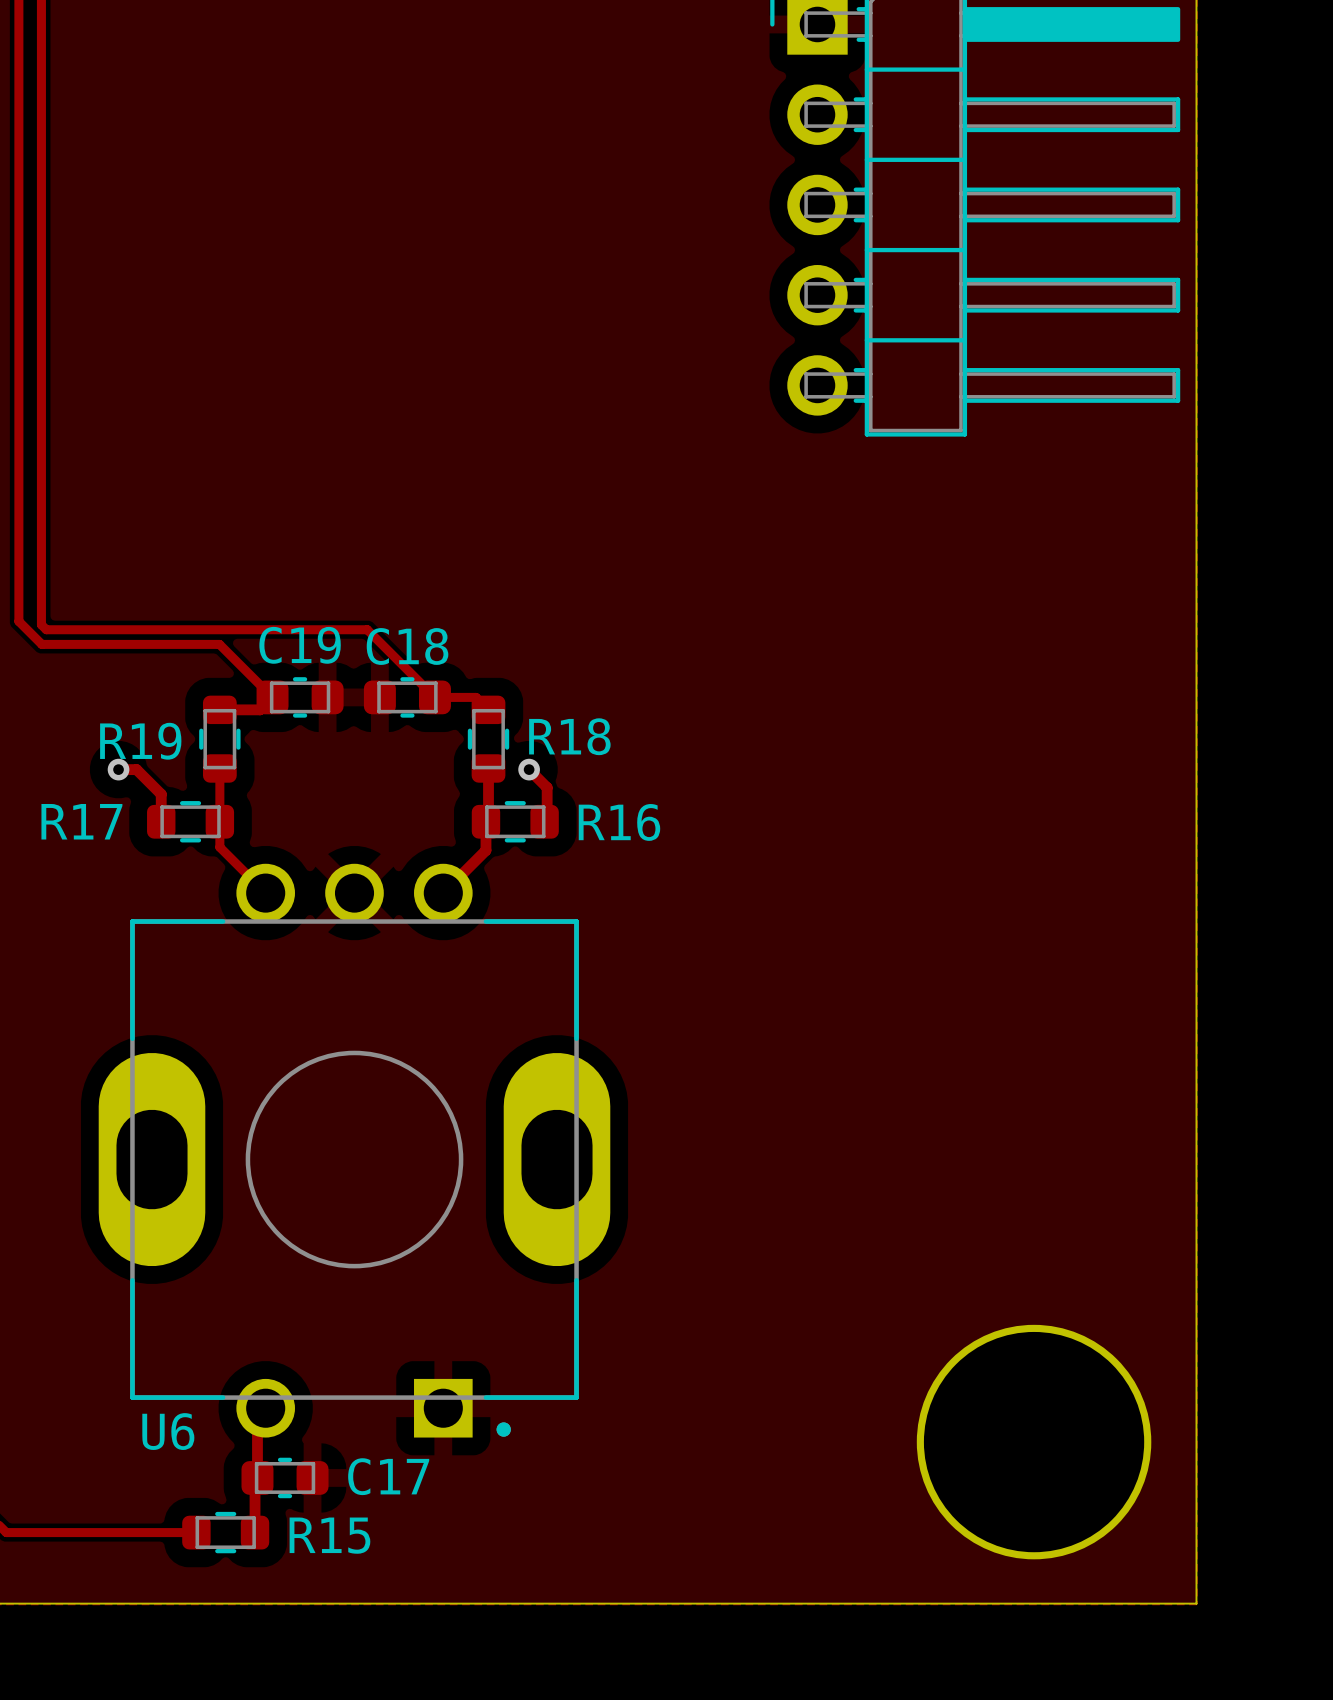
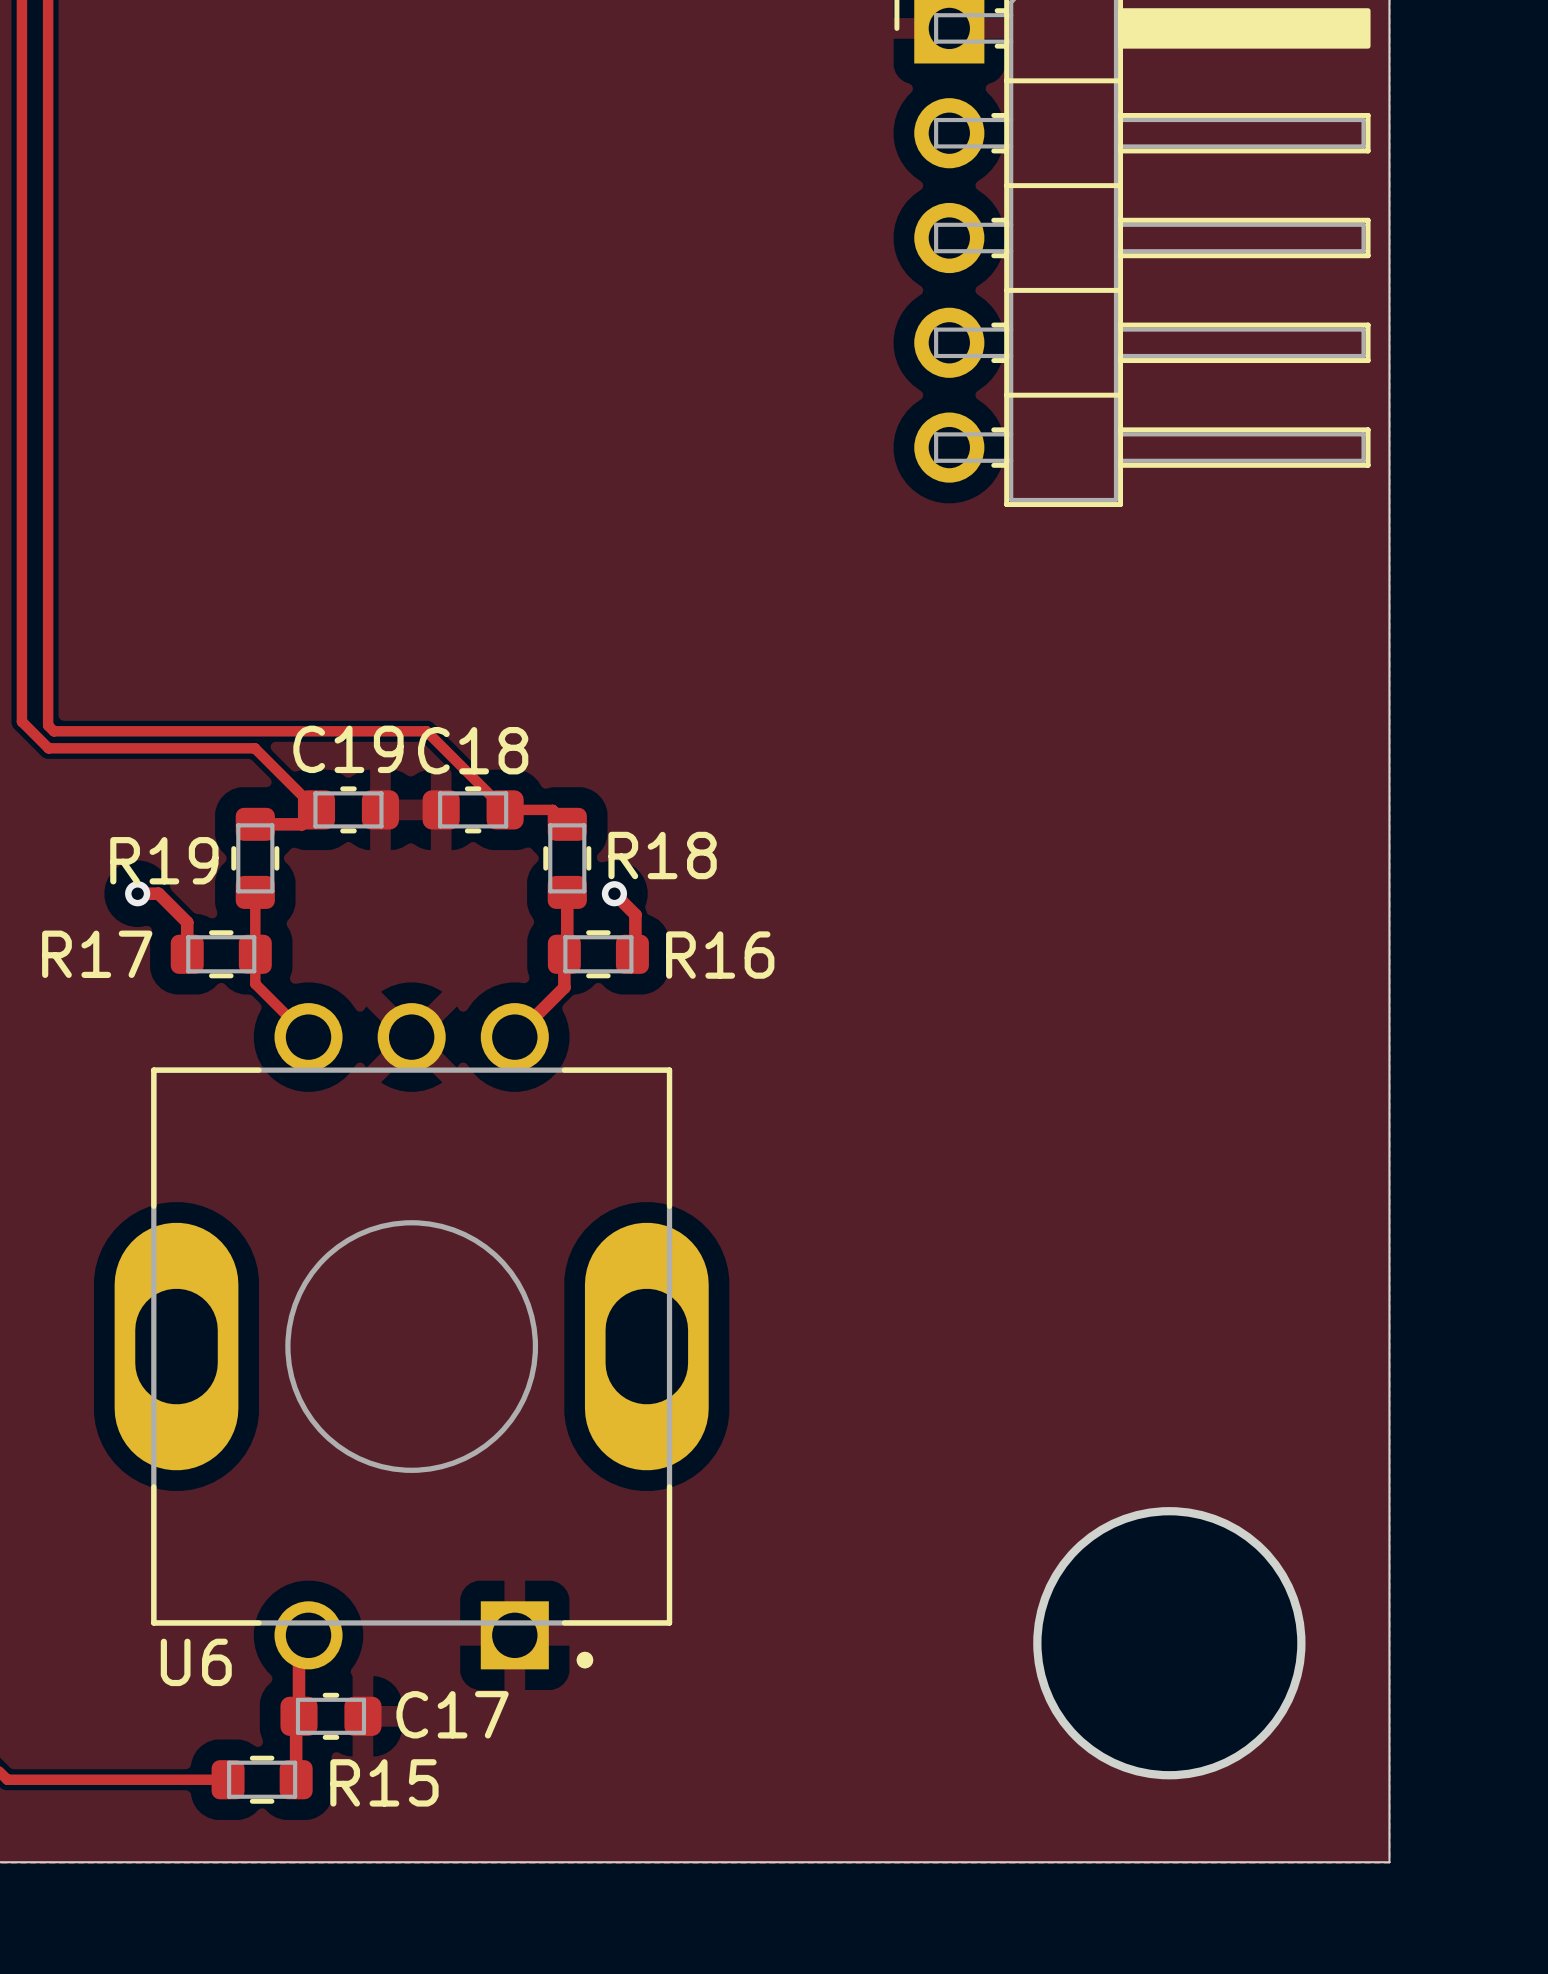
round board edge position: (1034, 1442) -> (1169, 1643)

